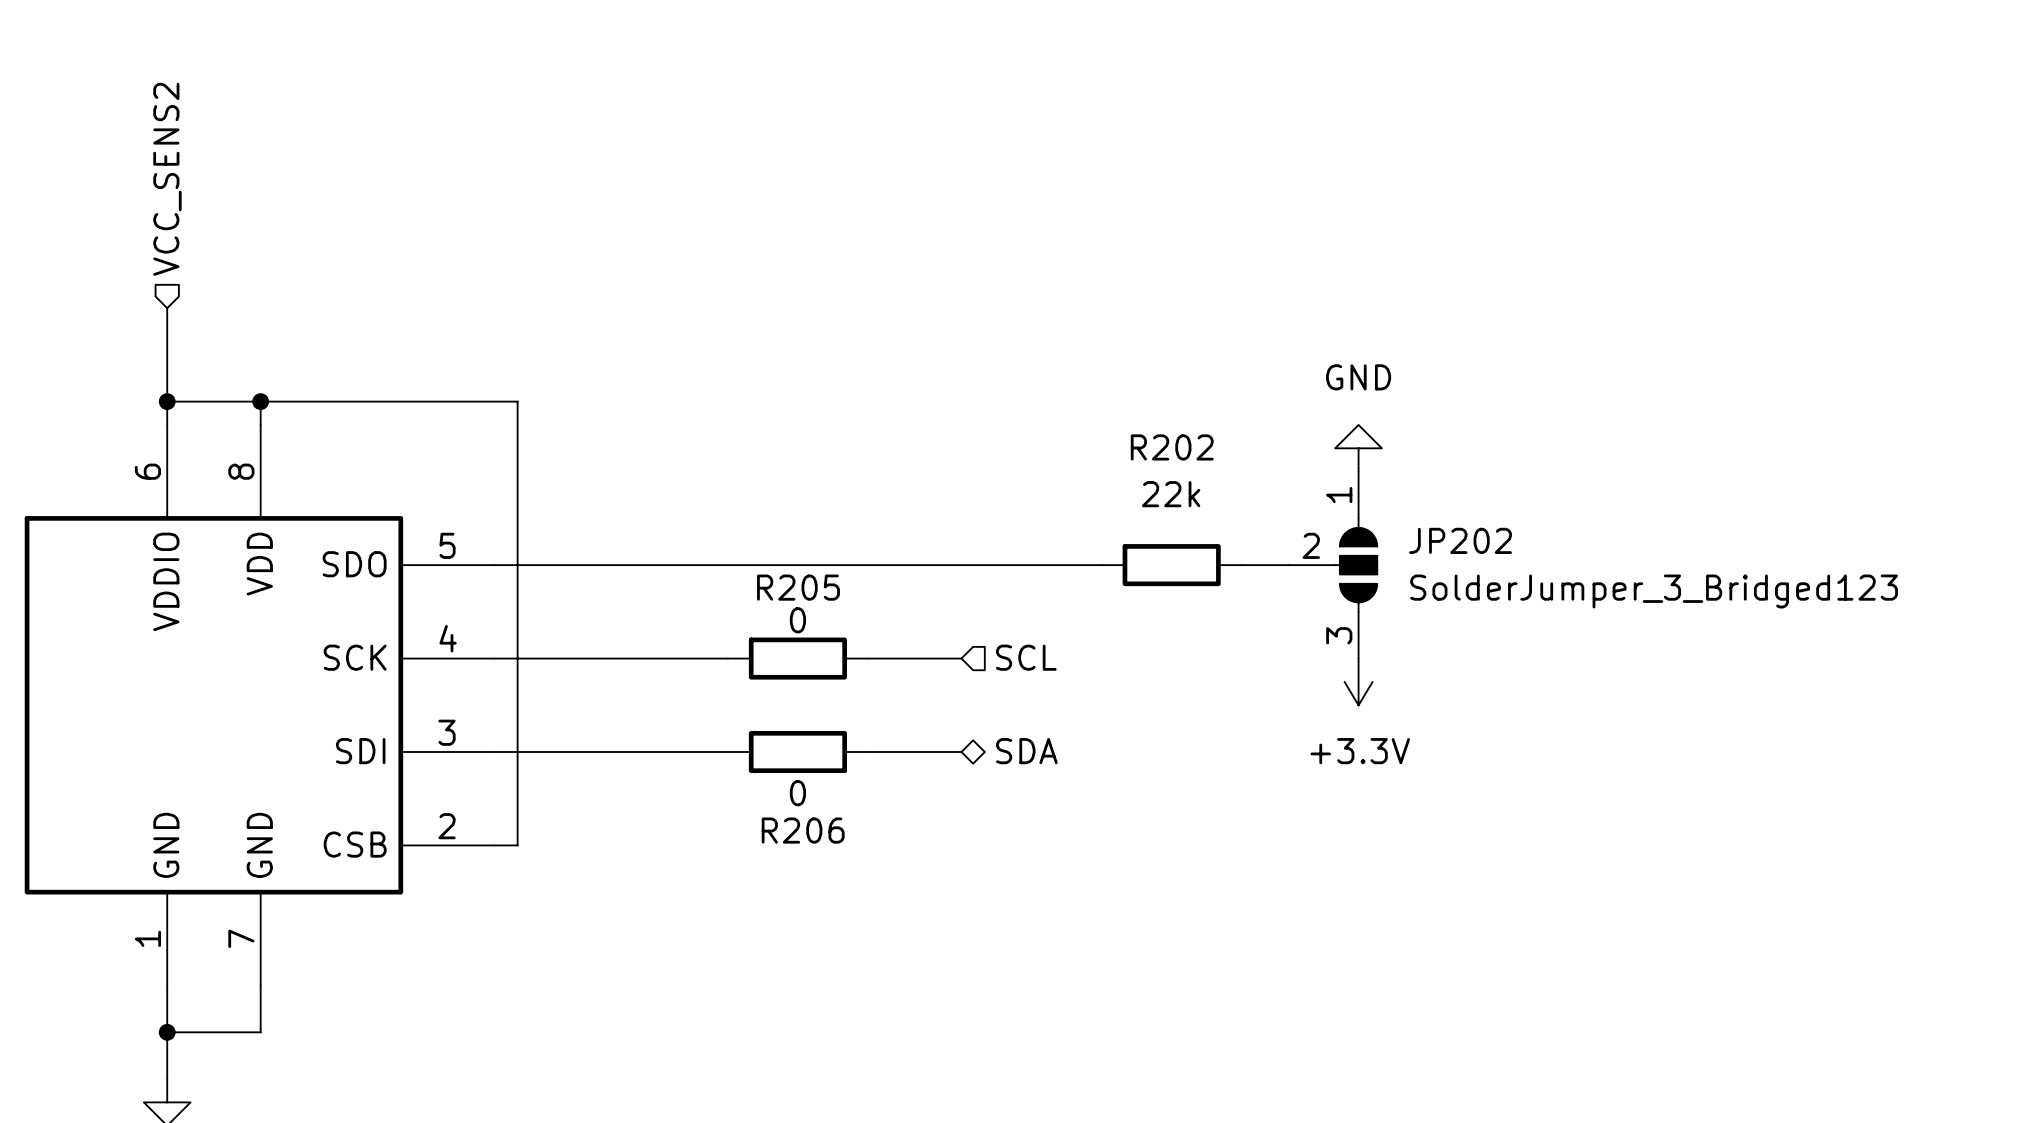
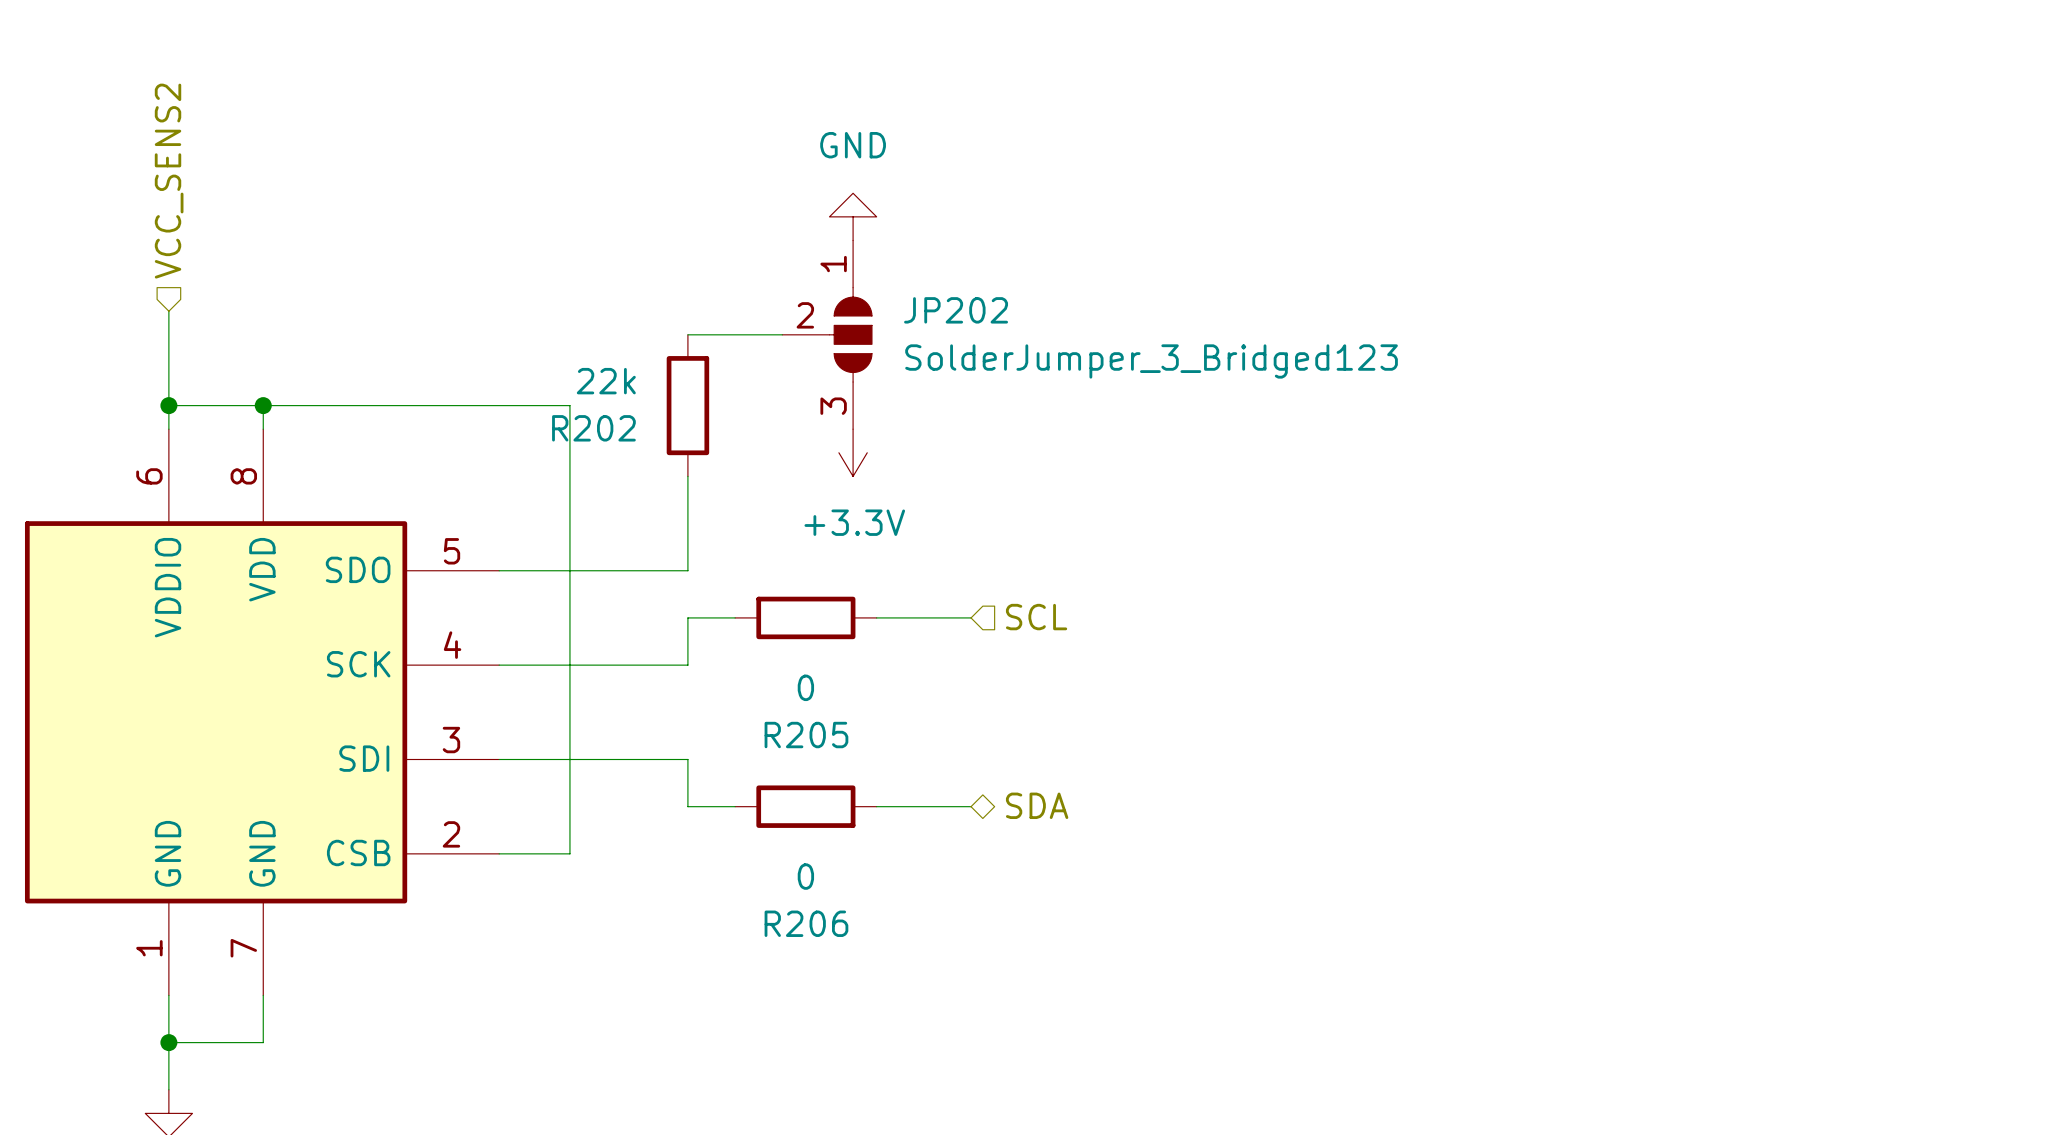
power symbol: none -> GND (853, 216)
wire: none -> (687, 334) (782, 334)
wire: (517, 401) (517, 845) -> (522, 405) (569, 405) (569, 853) (522, 853)
R202 name position: R202 (1172, 447) -> R202 (593, 428)
power symbol: none -> +3.3V (853, 452)
power symbol: GND (1358, 448) -> none
R202 value position: 22k (1171, 494) -> 22k (606, 381)
wire: (681, 565) (1101, 565) -> (687, 570) (687, 476)
R202 rotation: 0° (1171, 565) -> 90° clockwise (687, 405)
R202 position: (1171, 565) -> (687, 405)
wire: (1241, 565) (1288, 565) -> none
JP202 position: (1332, 565) -> (827, 334)
R205 name position: R205 (798, 587) -> R205 (806, 735)
R205 value position: 0 (797, 620) -> 0 (805, 687)
hierarchical label position: SCL (1026, 657) -> SCL (1036, 617)
wire: (681, 658) (727, 658) -> (687, 665) (687, 617) (735, 617)
R205 position: (797, 658) -> (805, 617)
wire: (868, 658) (961, 658) -> (876, 617) (971, 617)
power symbol: +3.3V (1358, 681) -> none
hierarchical label position: SDA (1026, 751) -> SDA (1037, 805)
wire: (681, 752) (727, 752) -> (687, 759) (687, 806) (735, 806)
R206 position: (797, 752) -> (805, 806)
wire: (868, 752) (961, 752) -> (876, 806) (971, 806)
R206 value position: 0 (797, 793) -> 0 (805, 876)
R206 name position: R206 (803, 830) -> R206 (806, 923)

